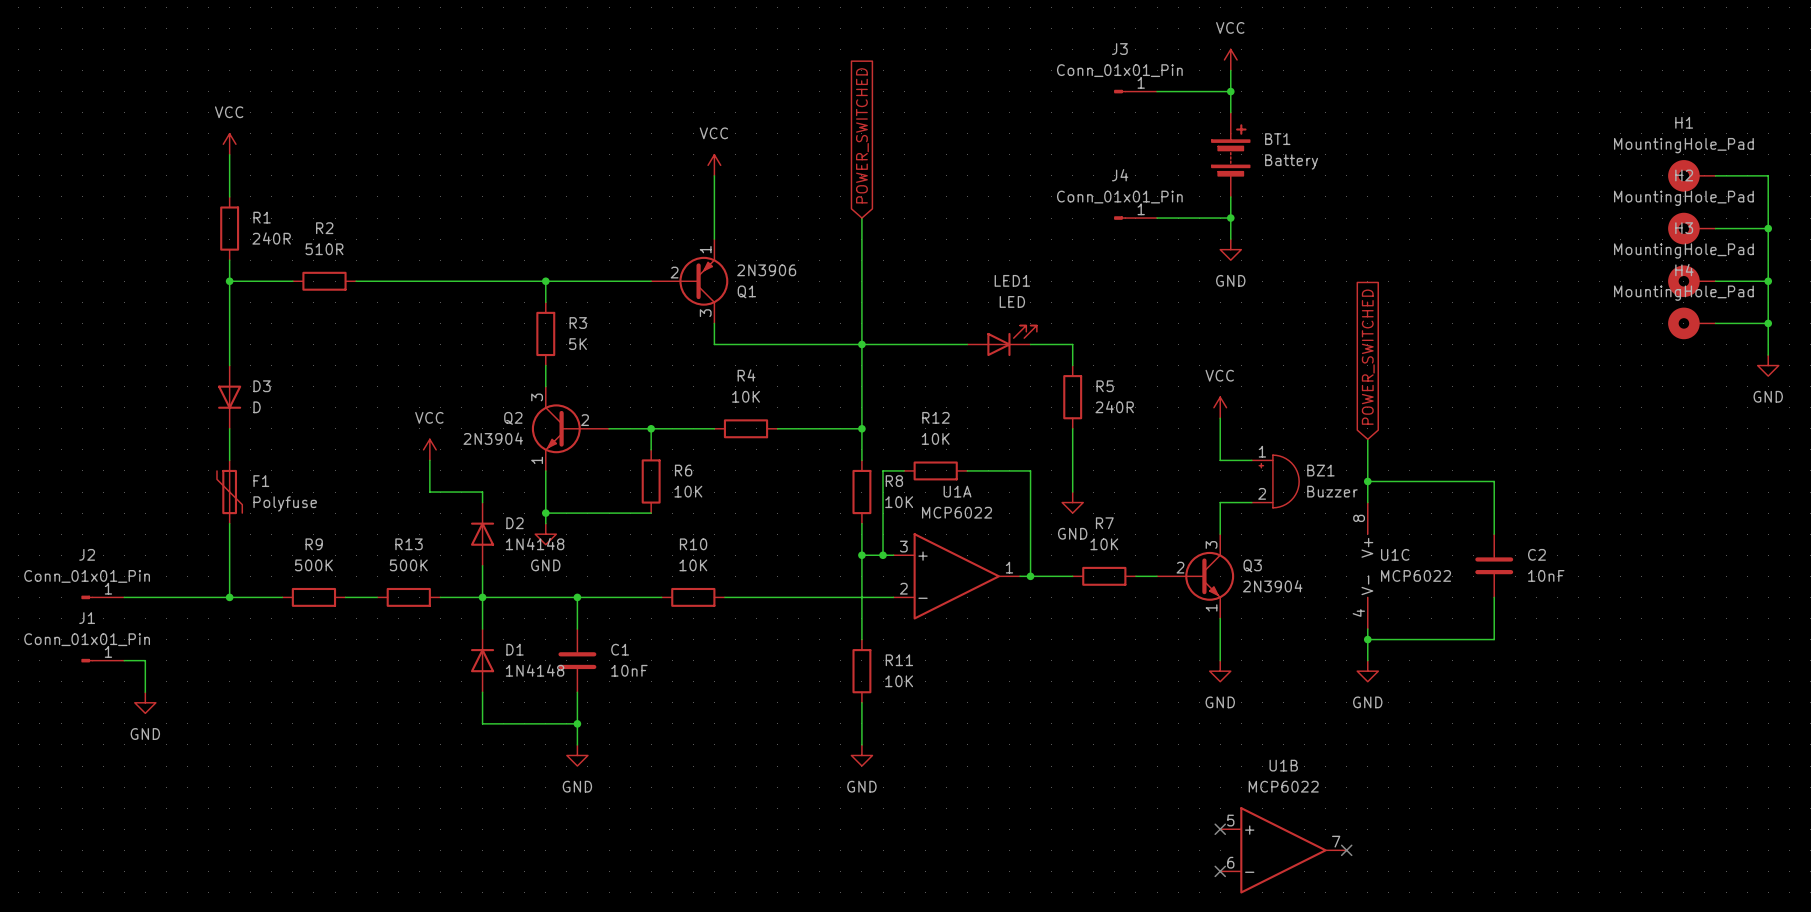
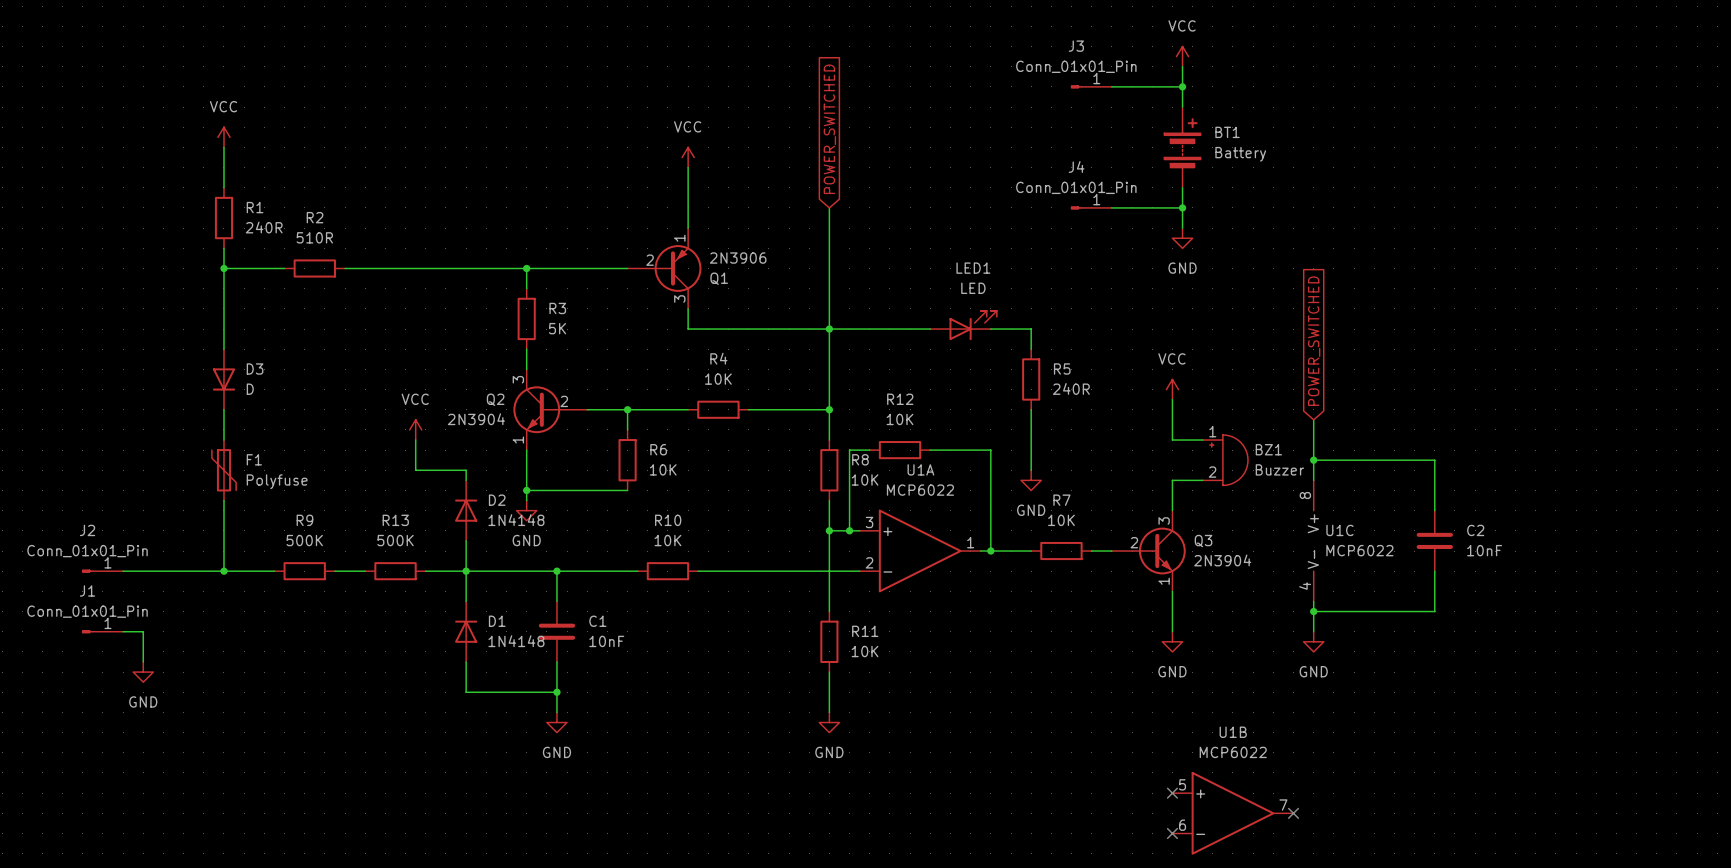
H1: MountingHole_Pad (1691, 175) -> none
wire: (1715, 175) (1768, 175) (1768, 355) -> none
H2: MountingHole_Pad (1691, 228) -> none
wire: (1715, 228) (1768, 228) -> none
junction: (1768, 228) -> none
H3: MountingHole_Pad (1691, 281) -> none
wire: (1715, 281) (1768, 281) -> none
junction: (1768, 281) -> none
H4: MountingHole_Pad (1691, 323) -> none
wire: (1715, 323) (1768, 323) -> none
junction: (1768, 323) -> none
power symbol: GND (1768, 365) -> none

